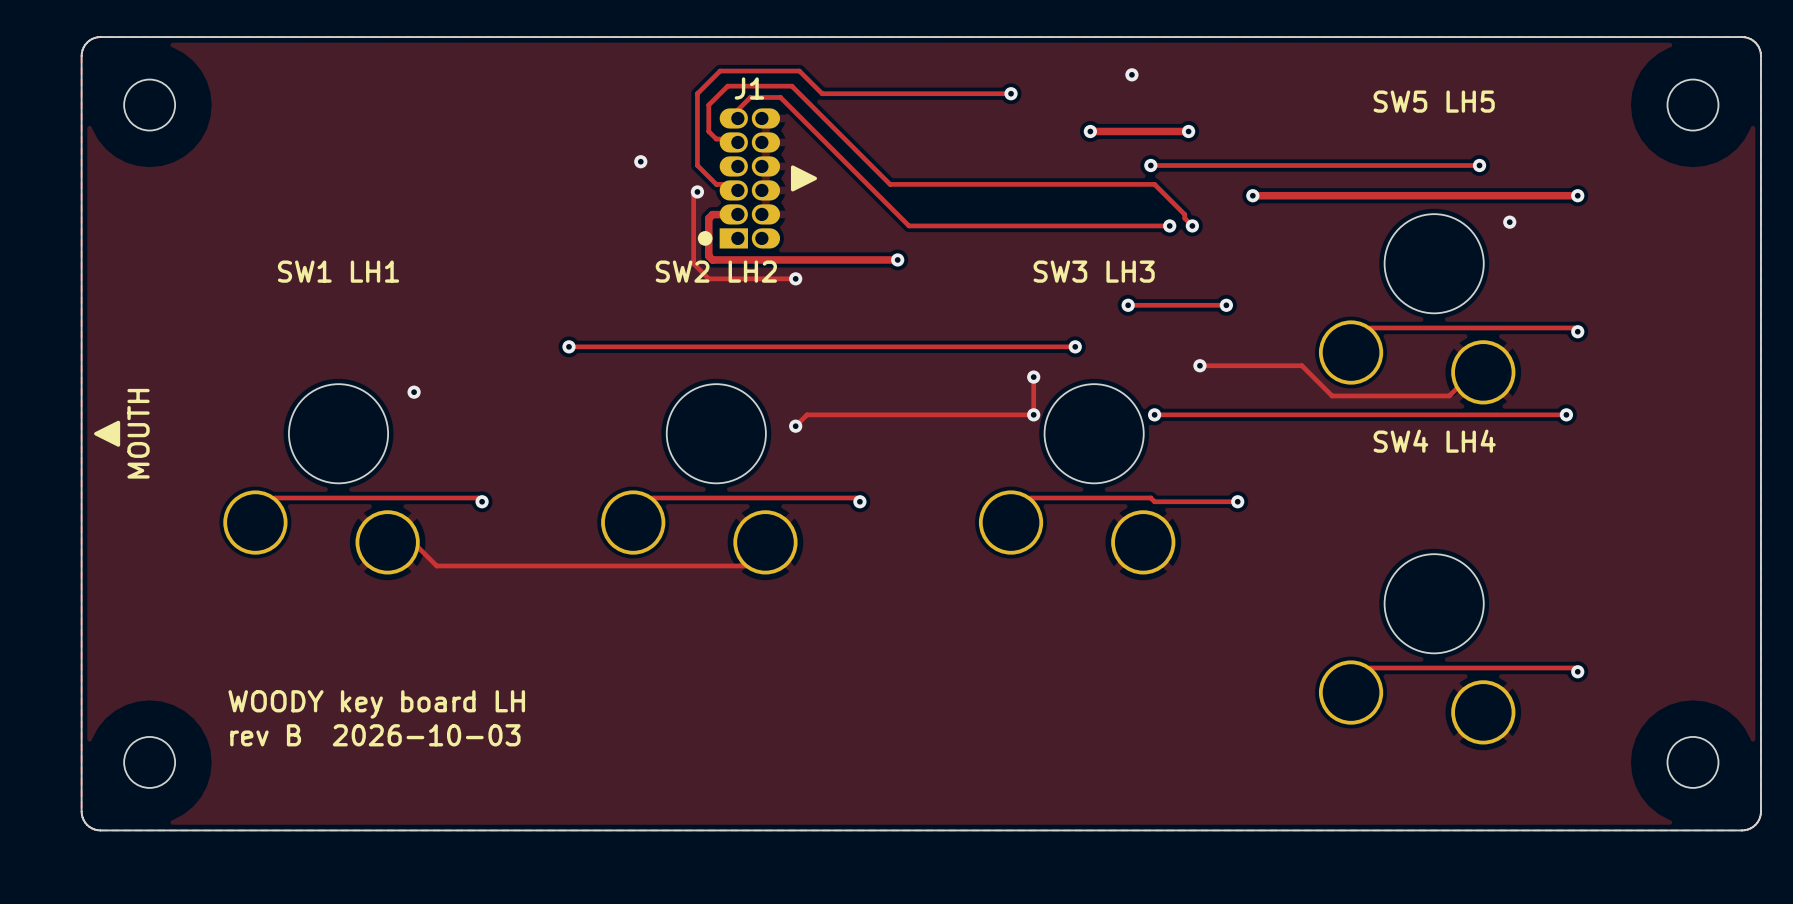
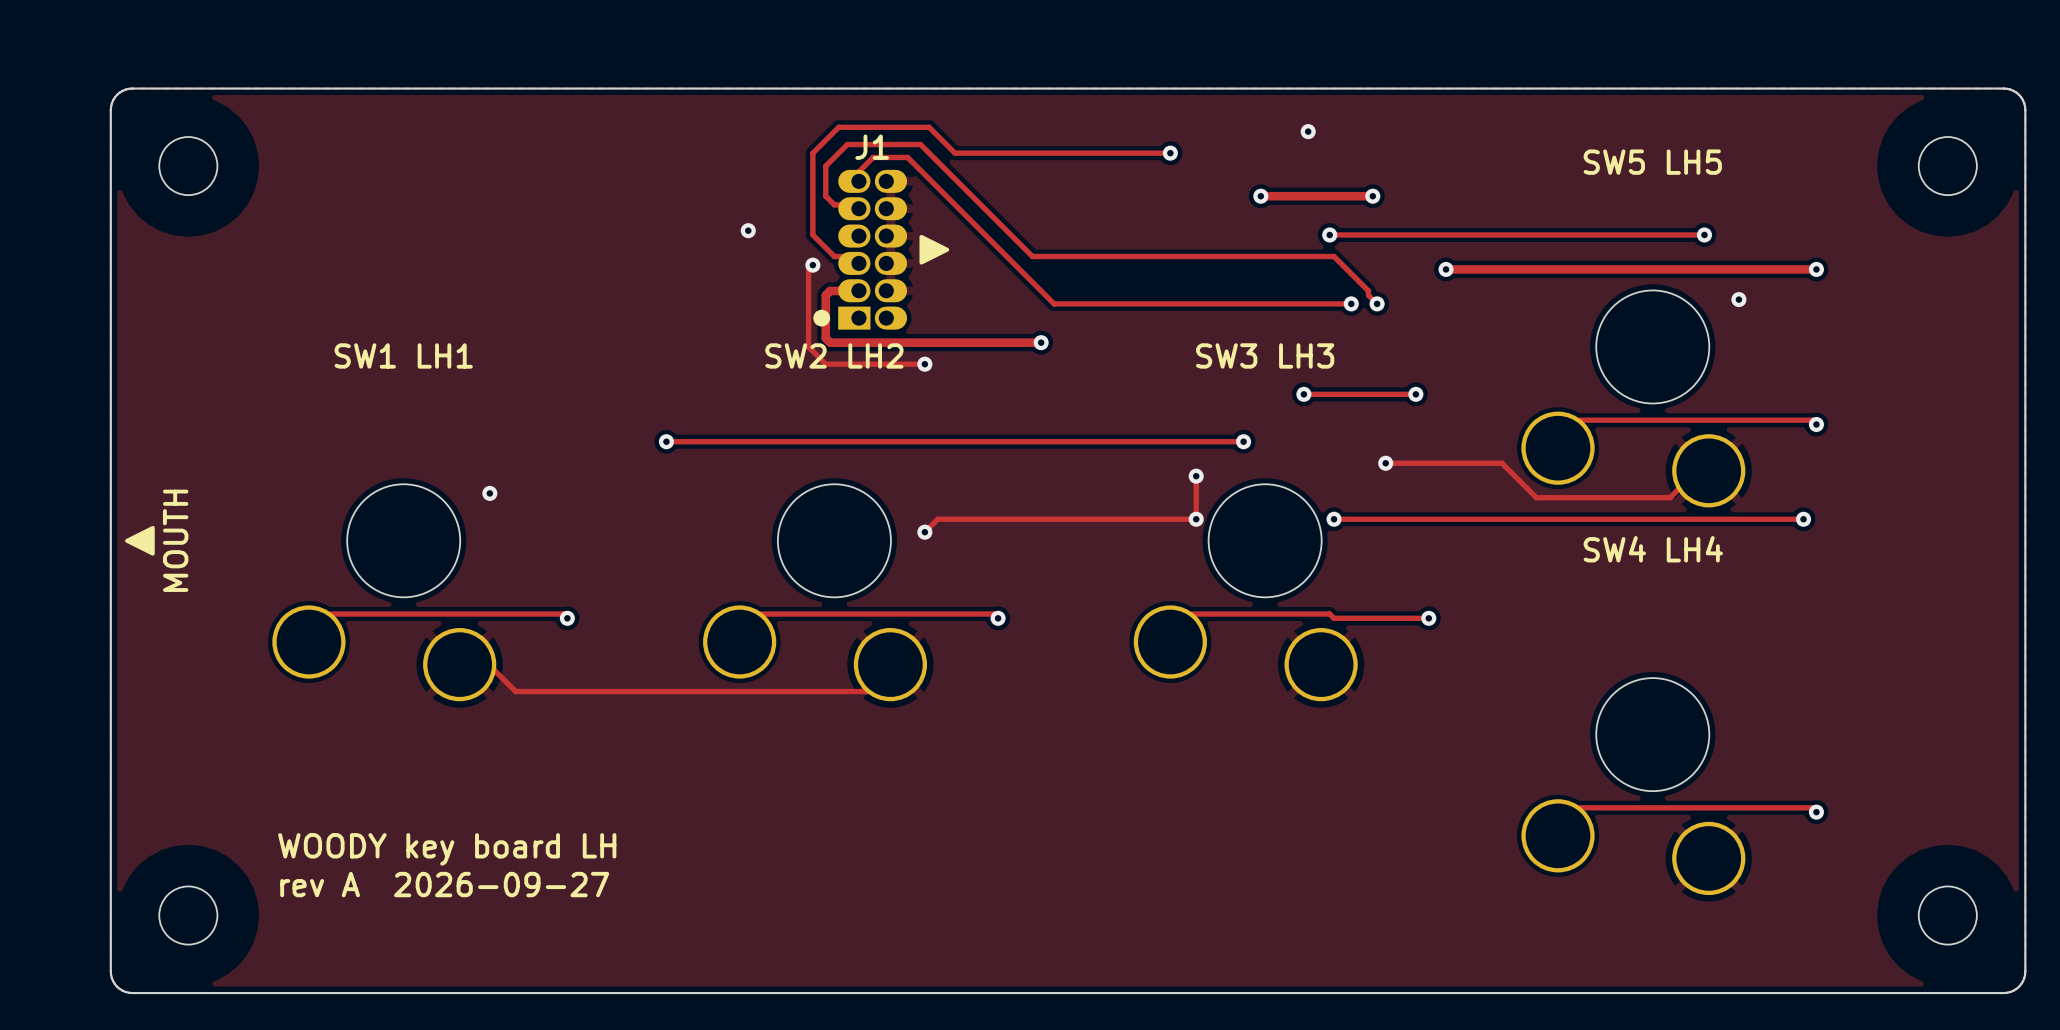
text: rev B 2026-10-03 (375, 735) -> rev A 2026-09-27 (444, 884)

